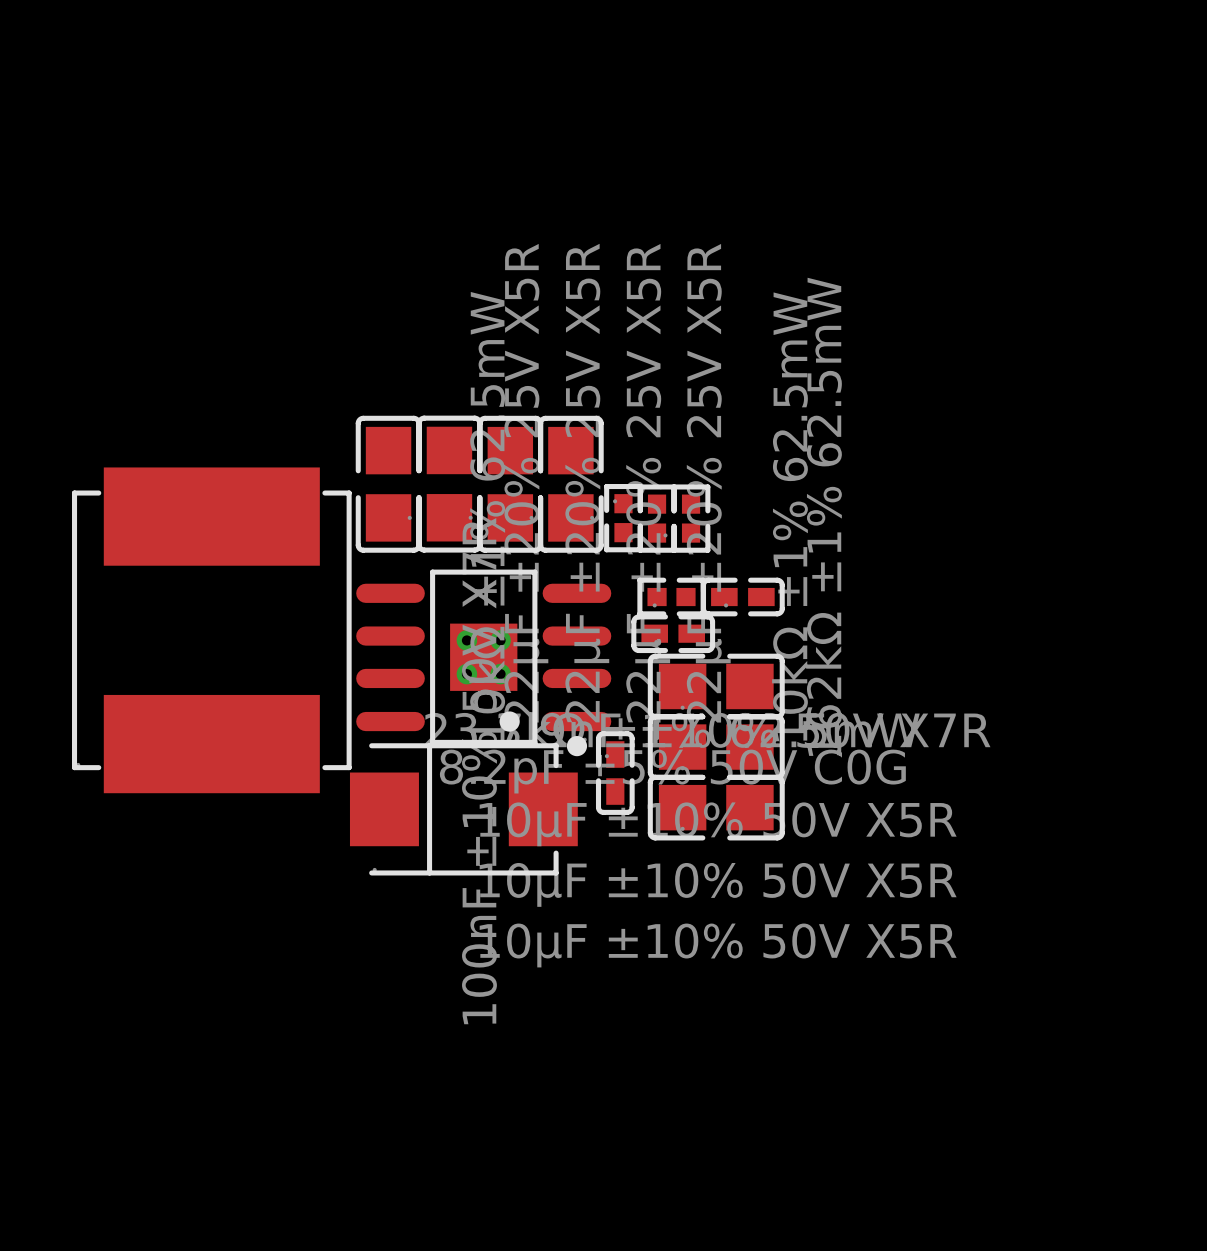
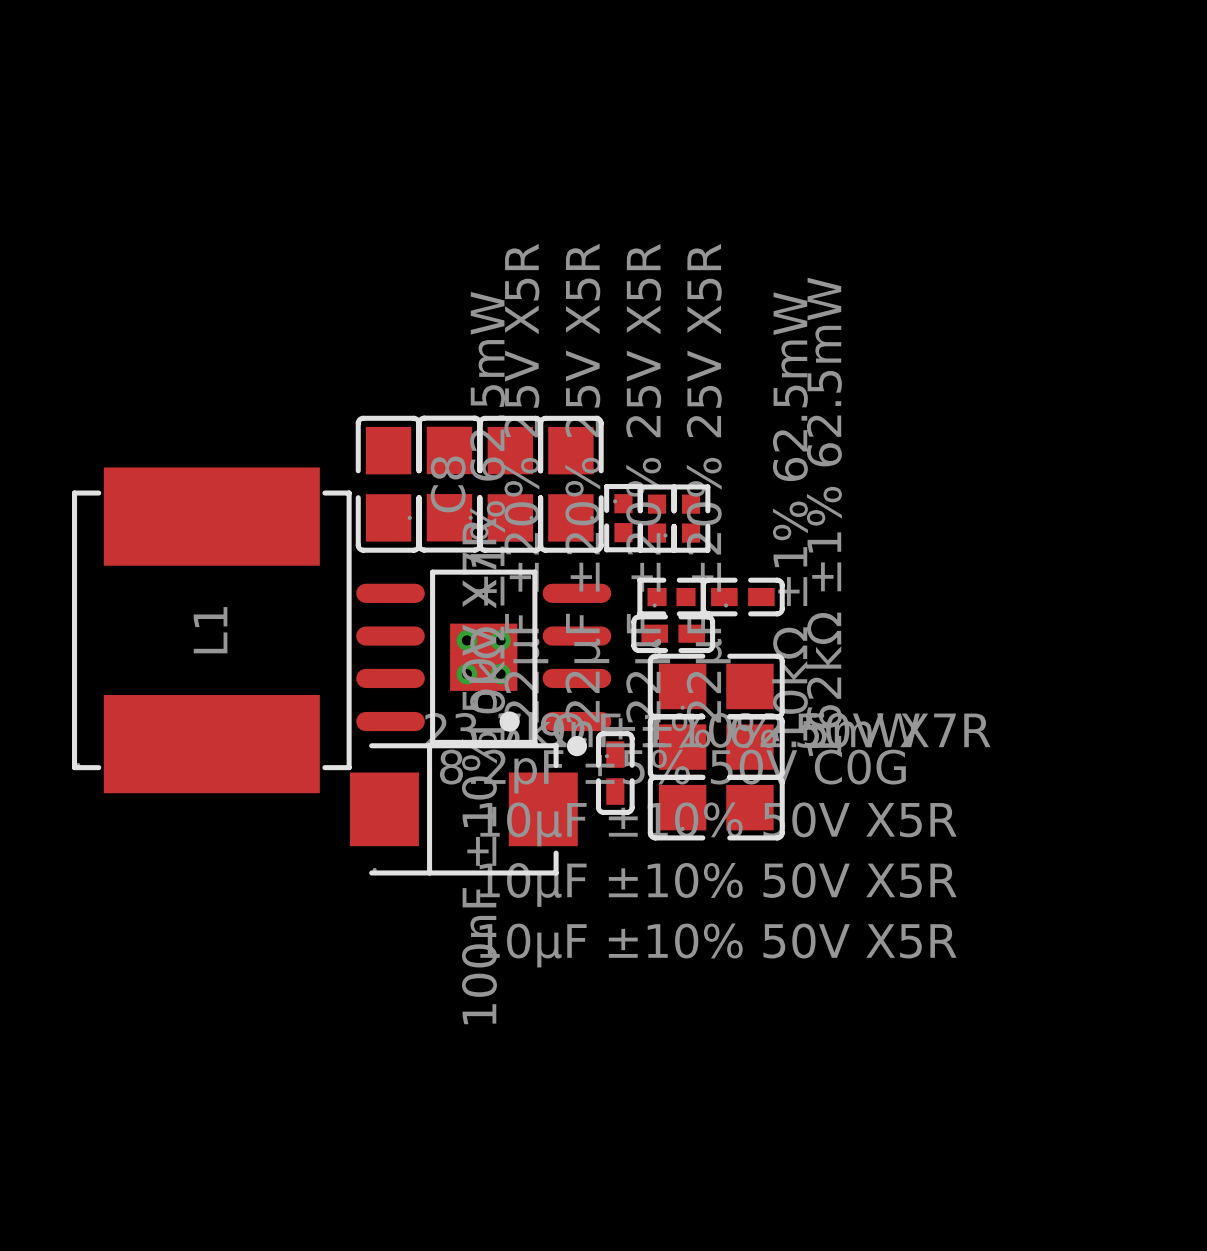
C8 name: none -> C8 (448, 484)
L1 name: none -> L1 (210, 630)

